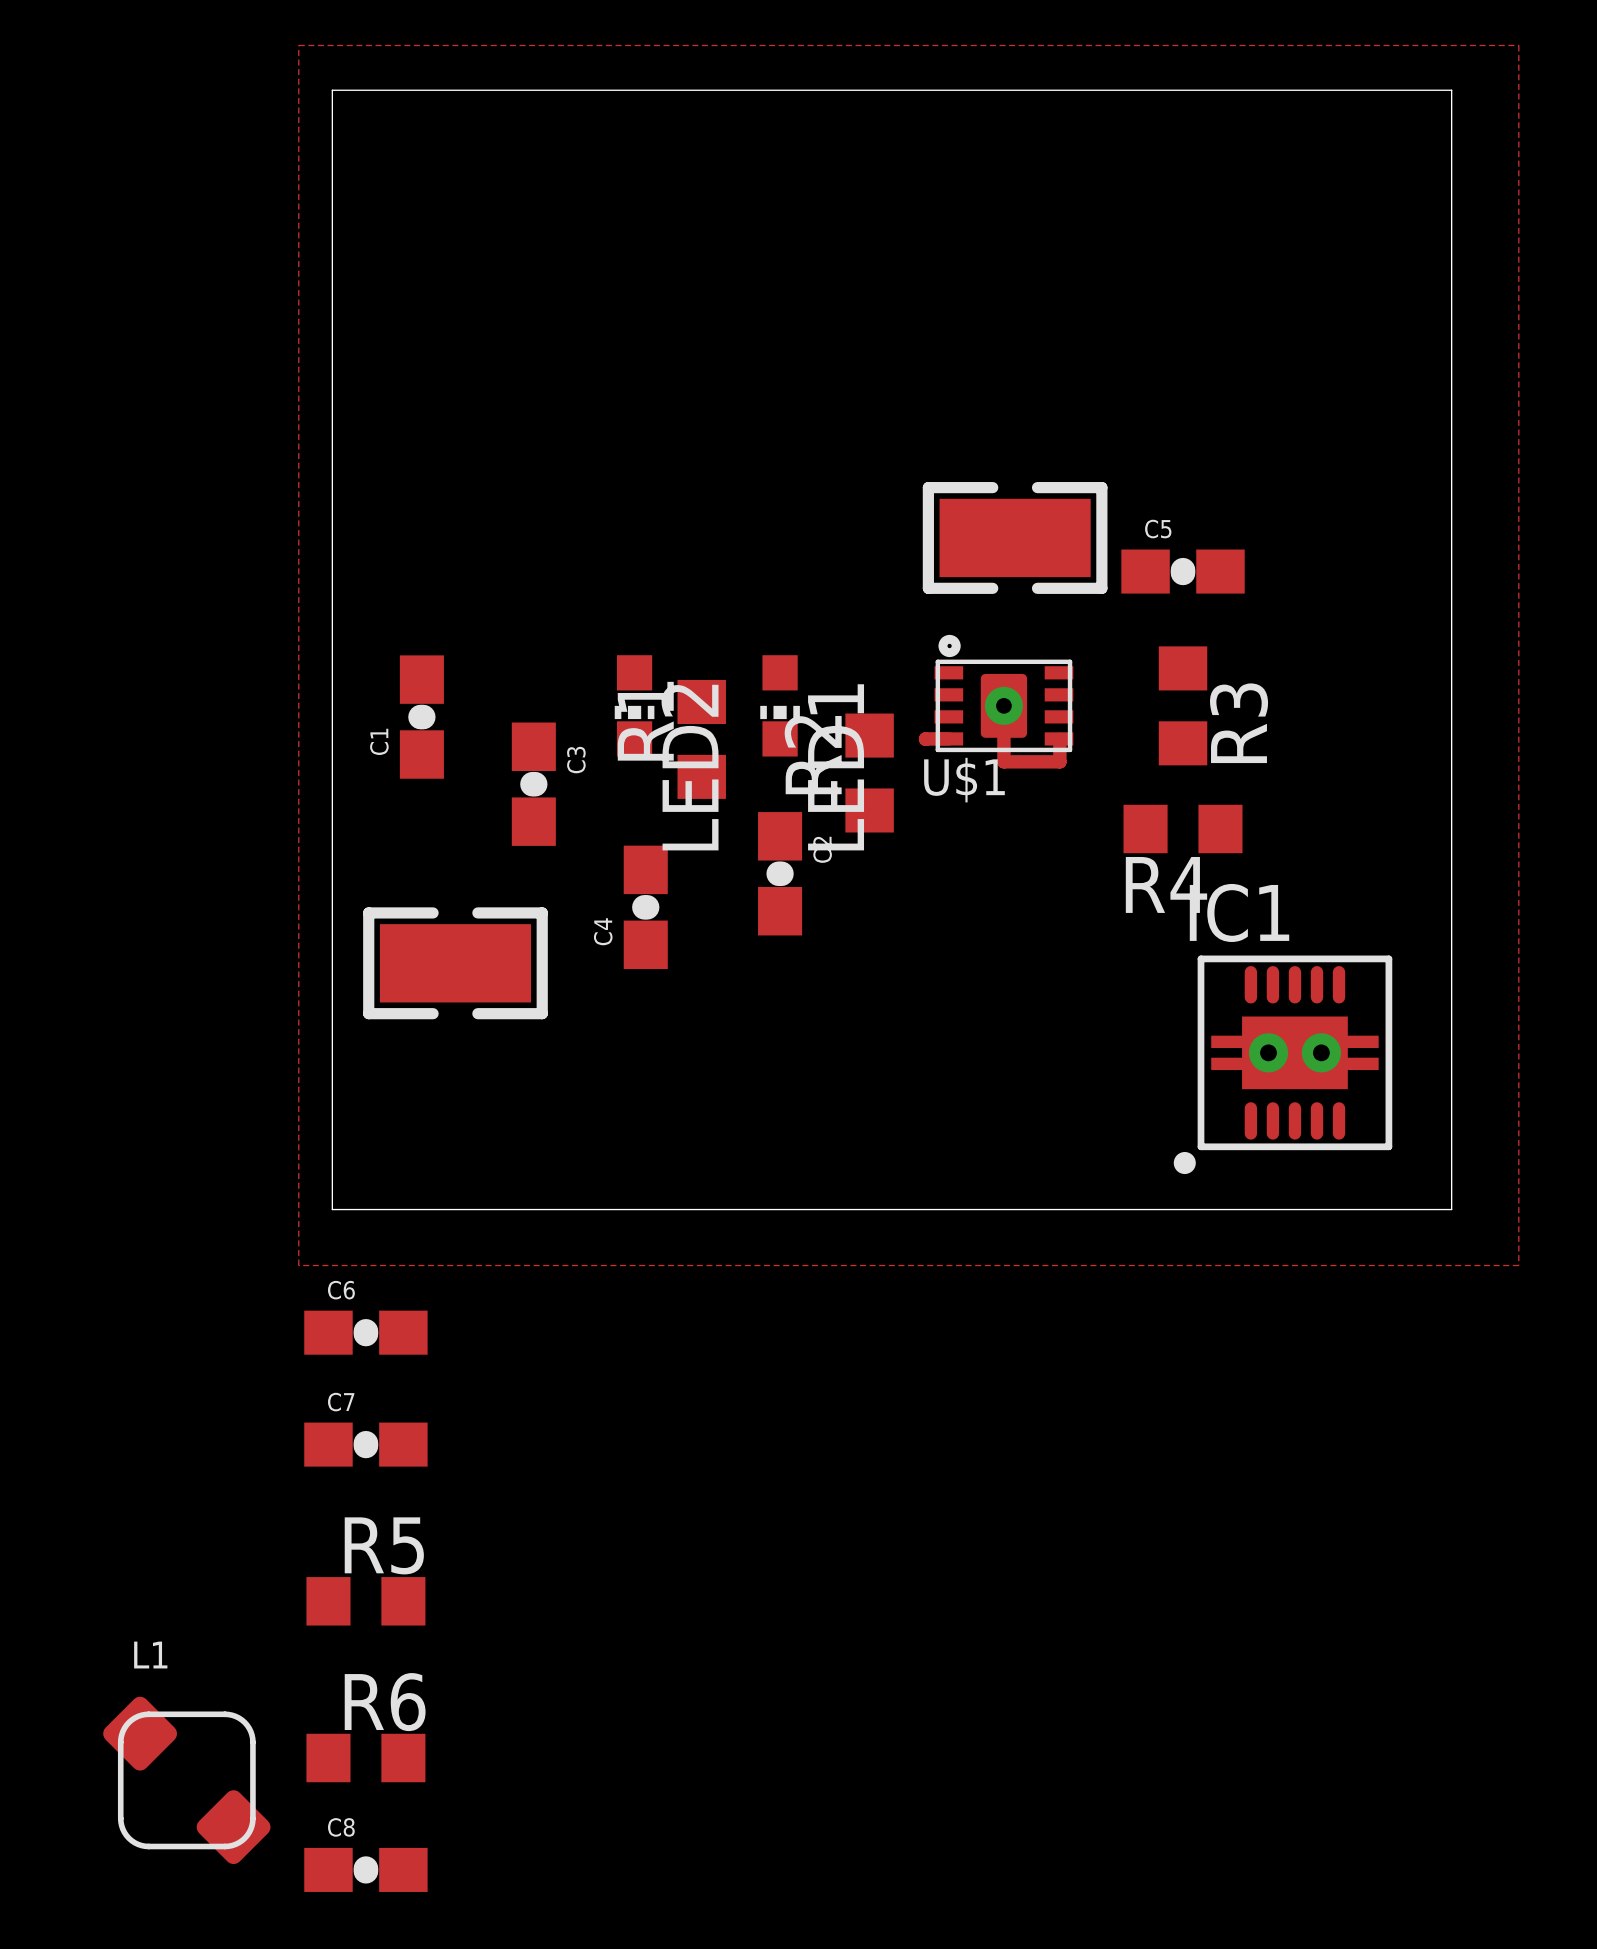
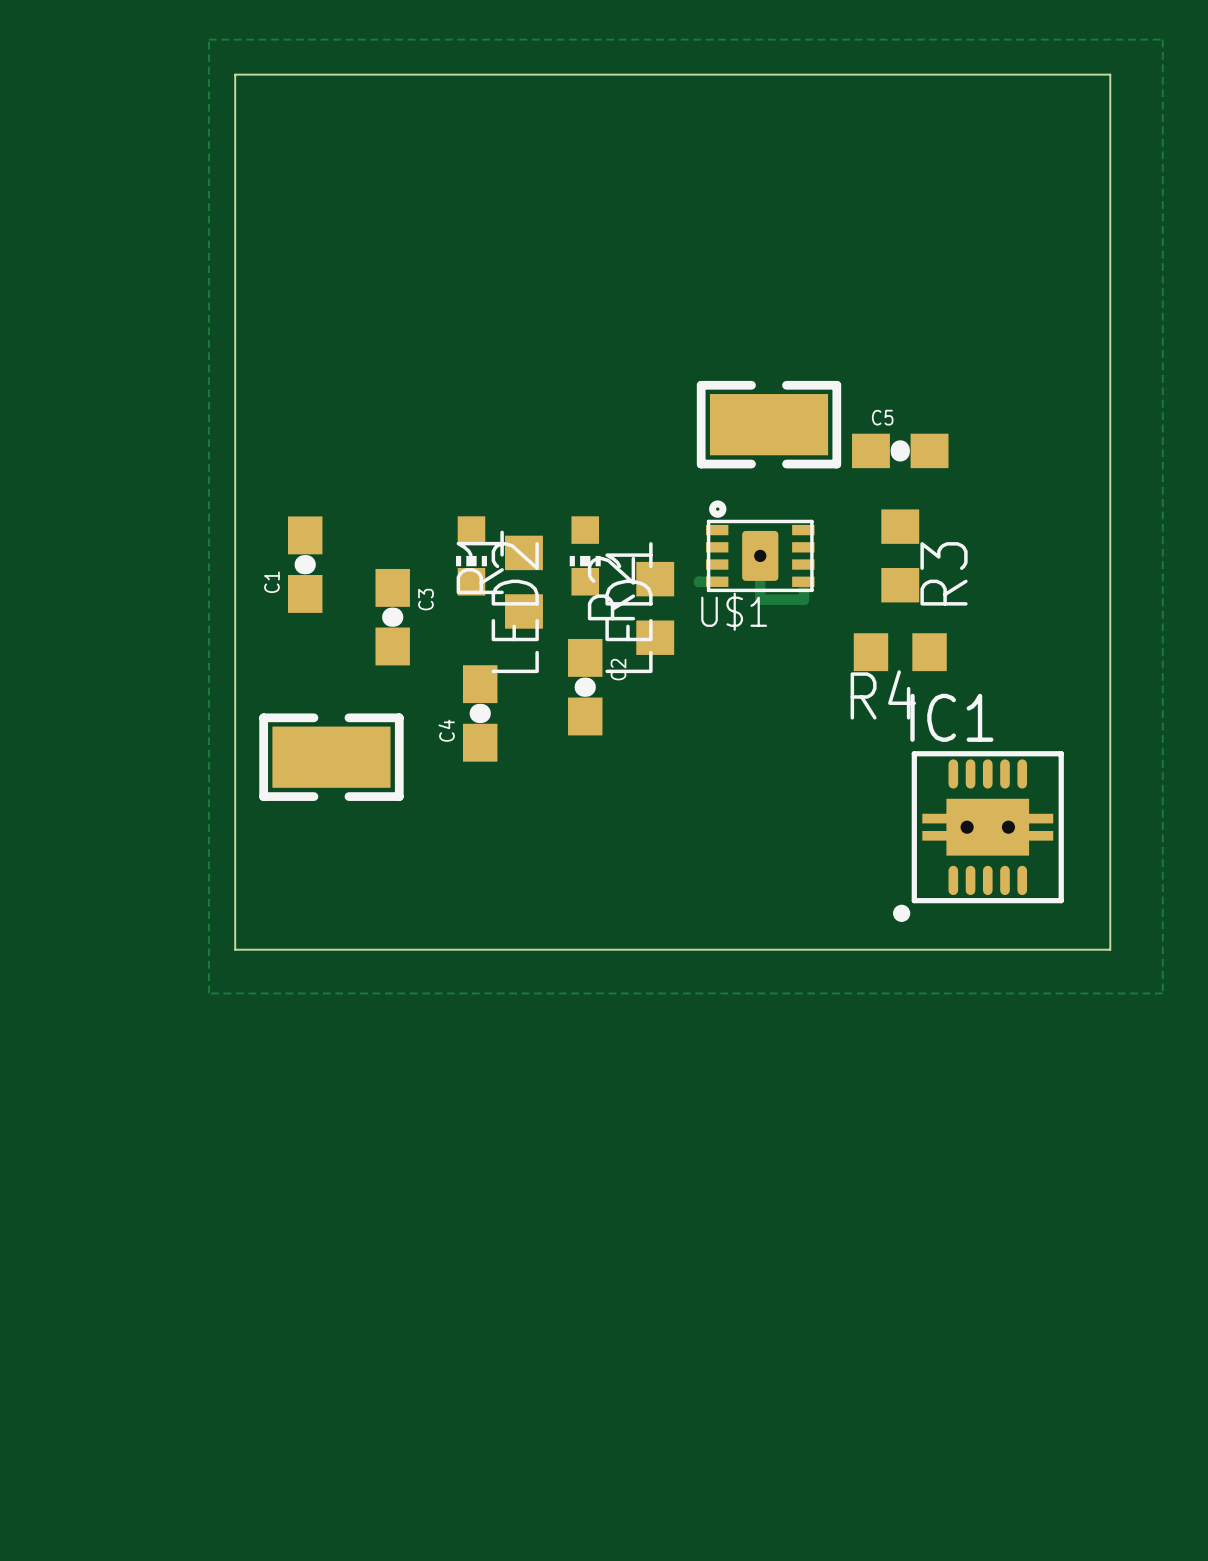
C6: (365, 1332) -> none
C7: (365, 1444) -> none
R5: (365, 1601) -> none
R6: (365, 1758) -> none
L1: (186, 1780) -> none
C8: (365, 1869) -> none

